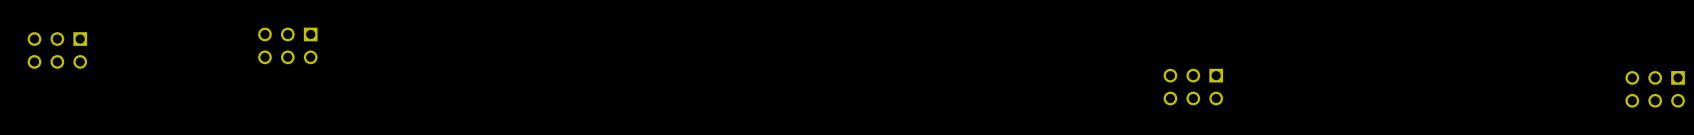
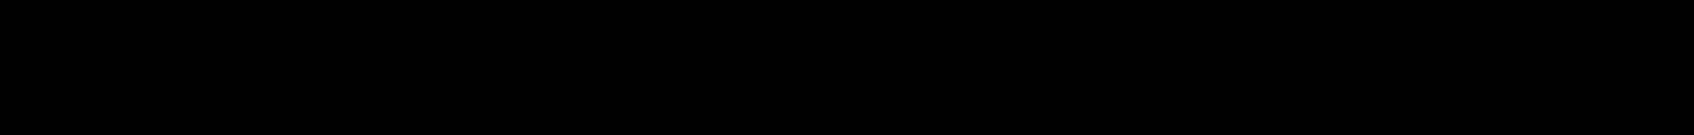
part: (287, 45) -> none
part: (57, 50) -> none
part: (1193, 87) -> none
part: (1655, 89) -> none

